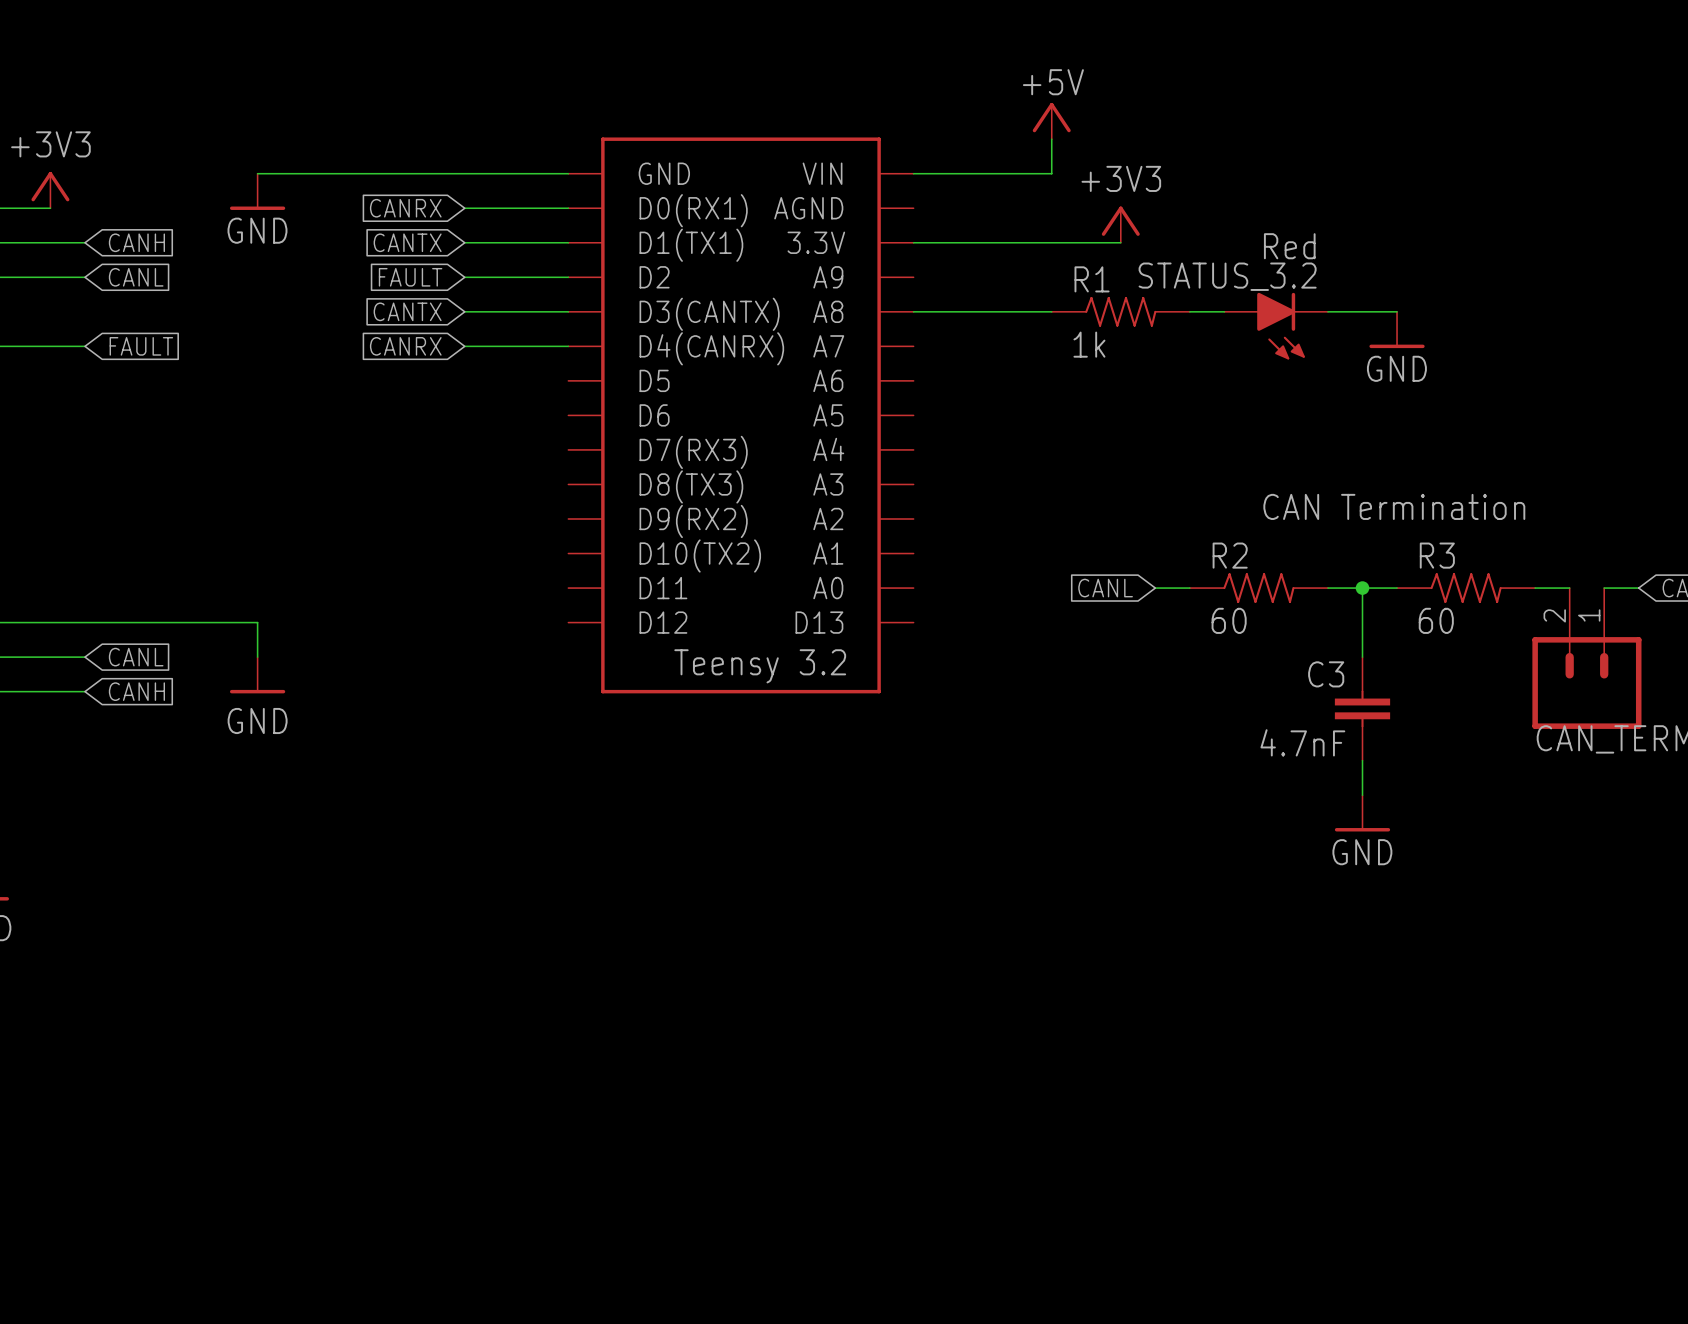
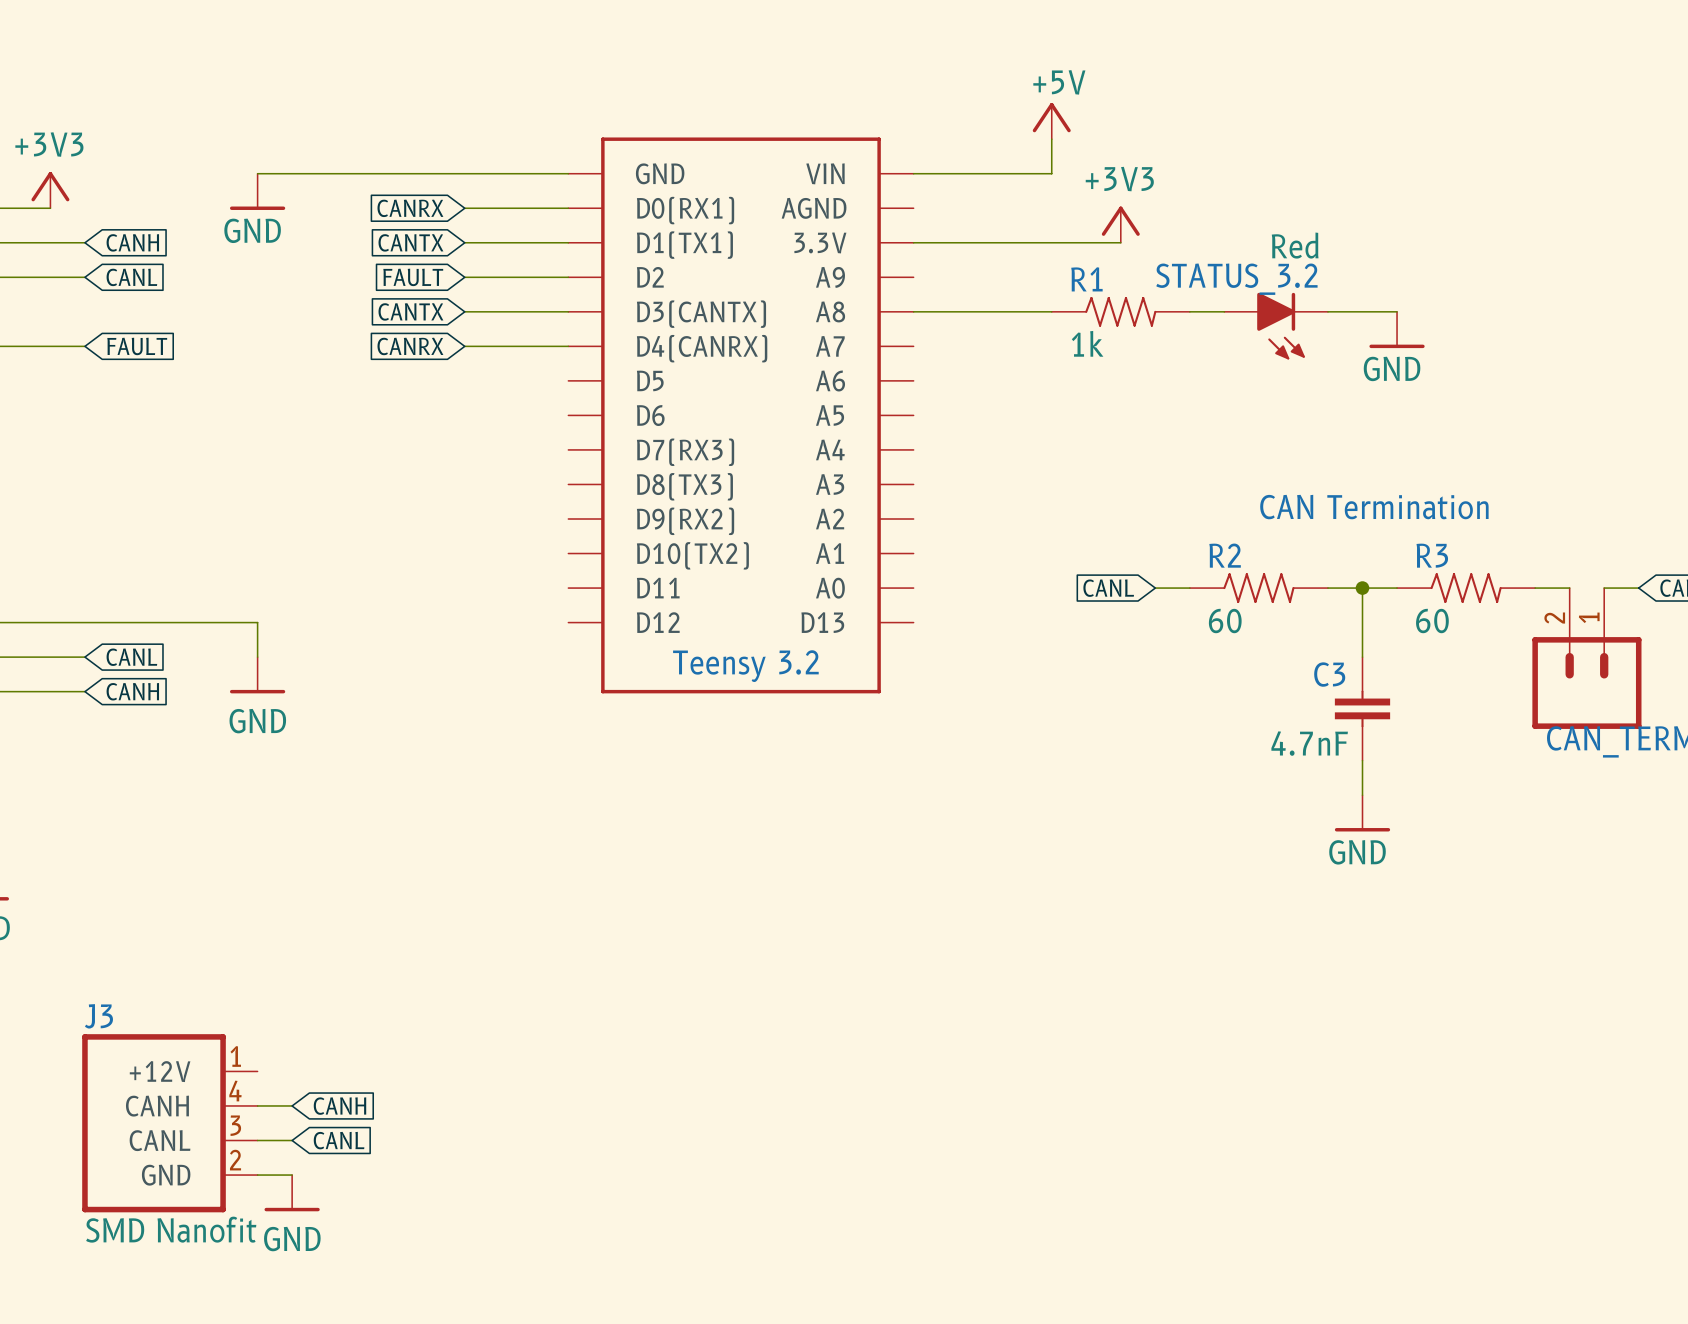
wire: none -> (257, 1105) (292, 1105)
global label: none -> CANH (339, 1106)
J3: none -> (169, 1123)
wire: none -> (257, 1140) (292, 1140)
global label: none -> CANL (339, 1140)
wire: none -> (257, 1175) (292, 1175)
power symbol: none -> GND (292, 1193)

